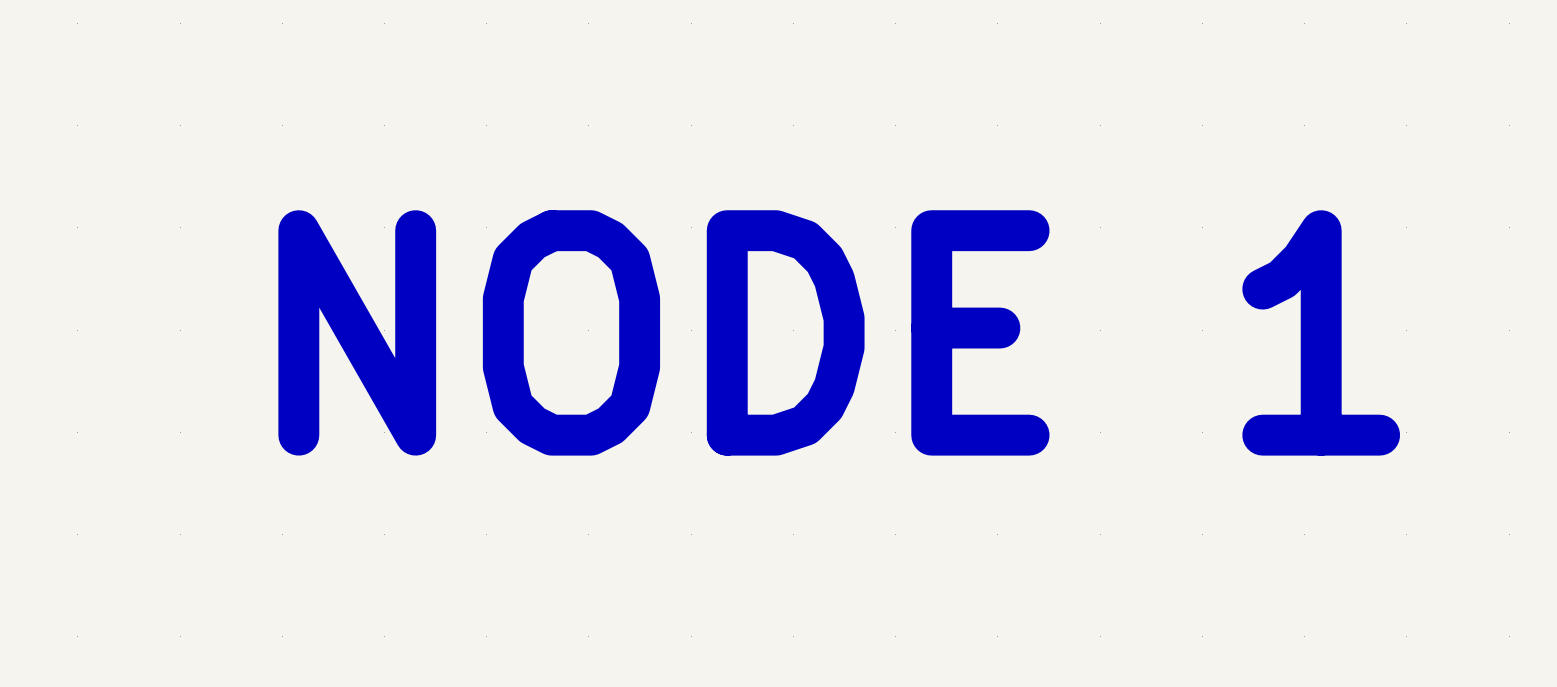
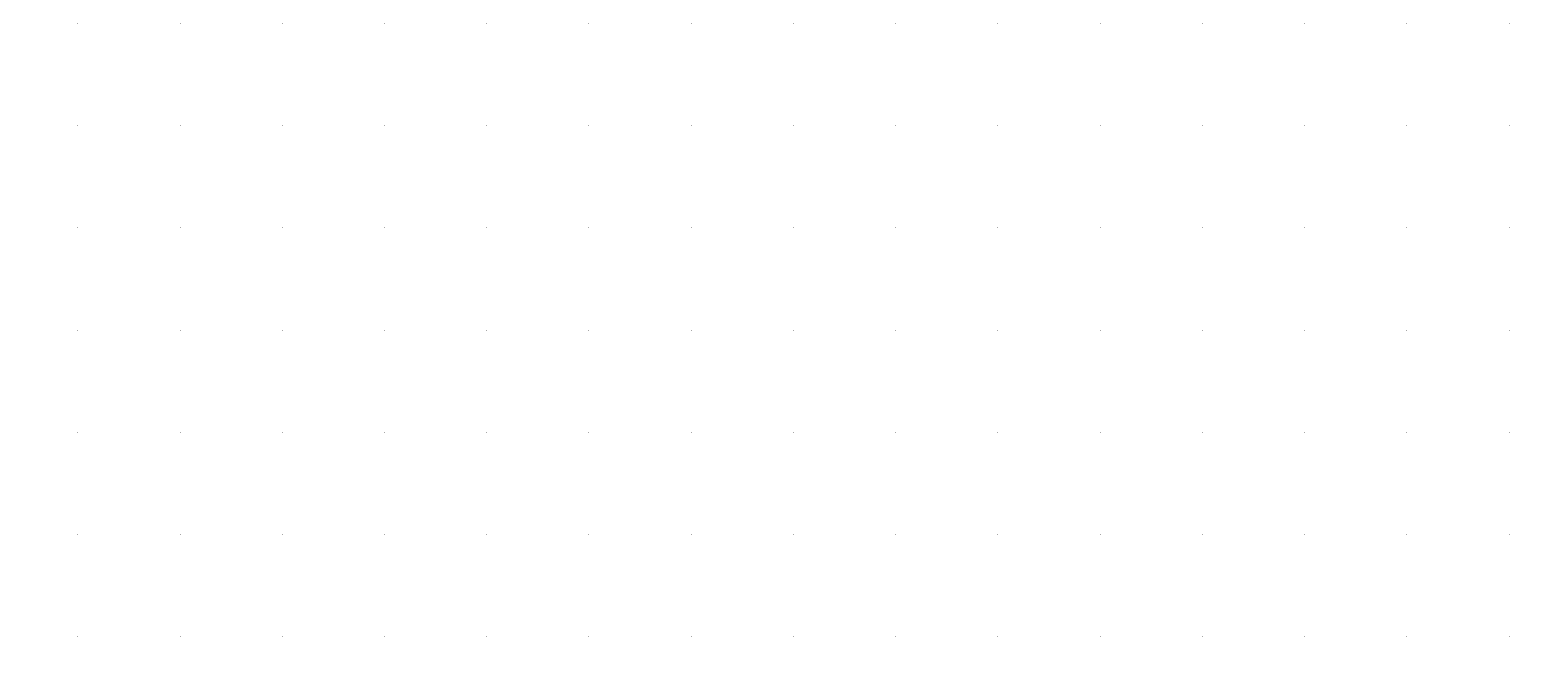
text: NODE 1 (839, 332) -> none

